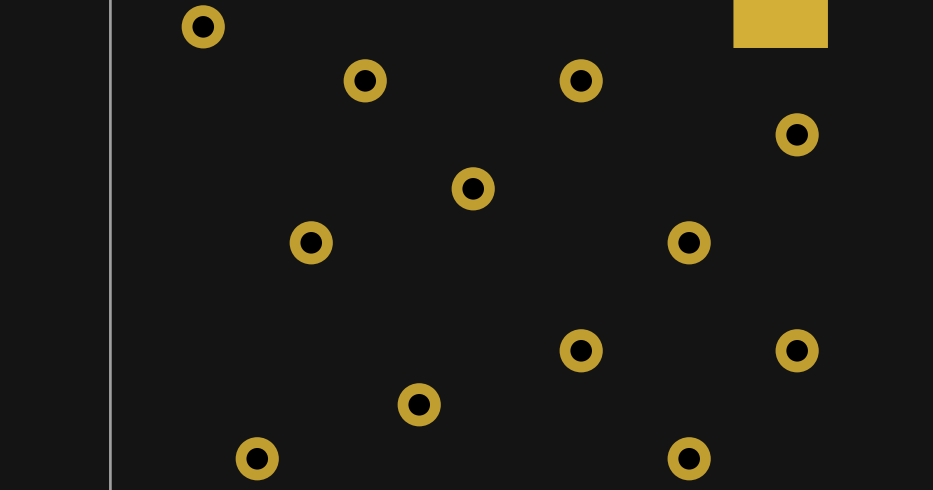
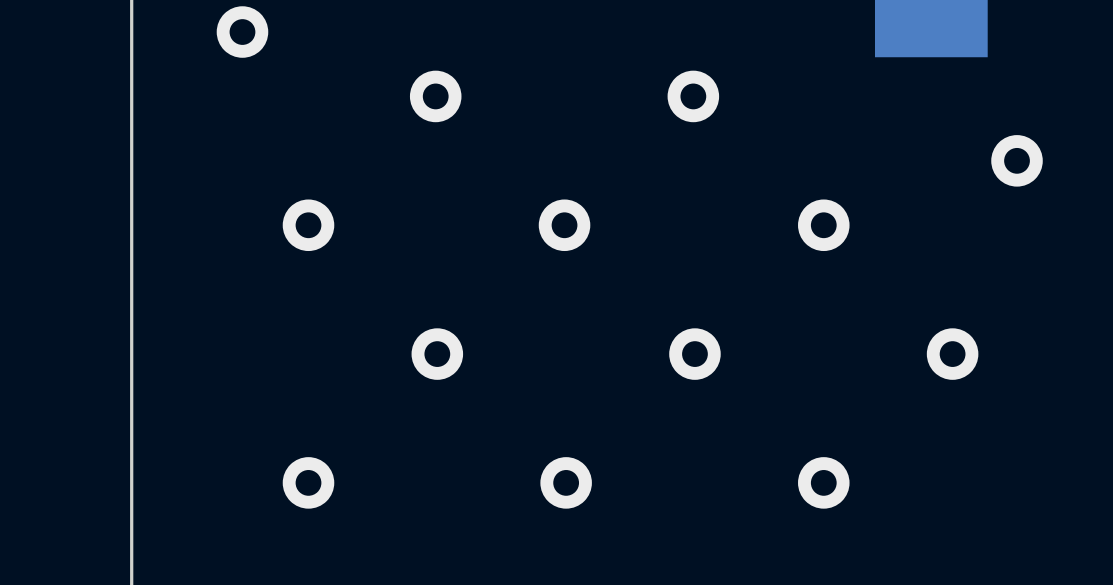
via position: (797, 134) -> (1017, 160)
via: none -> (308, 225)
via: (311, 242) -> none
via position: (689, 242) -> (823, 225)
via: none -> (437, 354)
via position: (581, 350) -> (694, 354)
via position: (797, 350) -> (952, 354)
via position: (419, 404) -> (566, 482)
via position: (257, 458) -> (308, 482)
via position: (689, 458) -> (823, 482)

